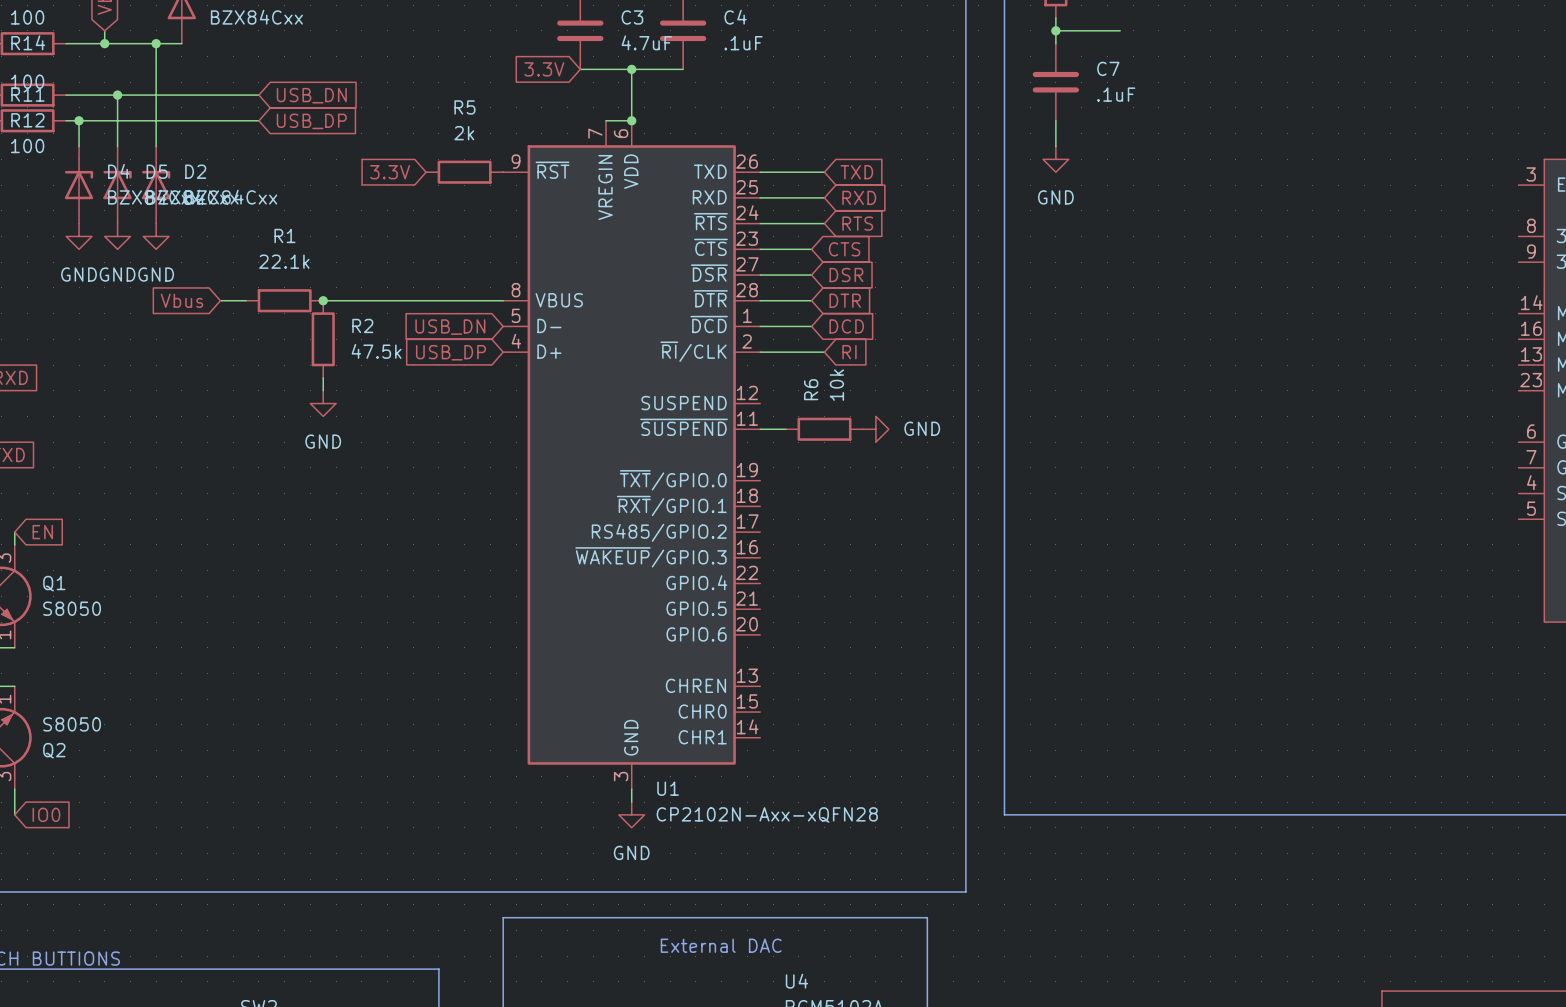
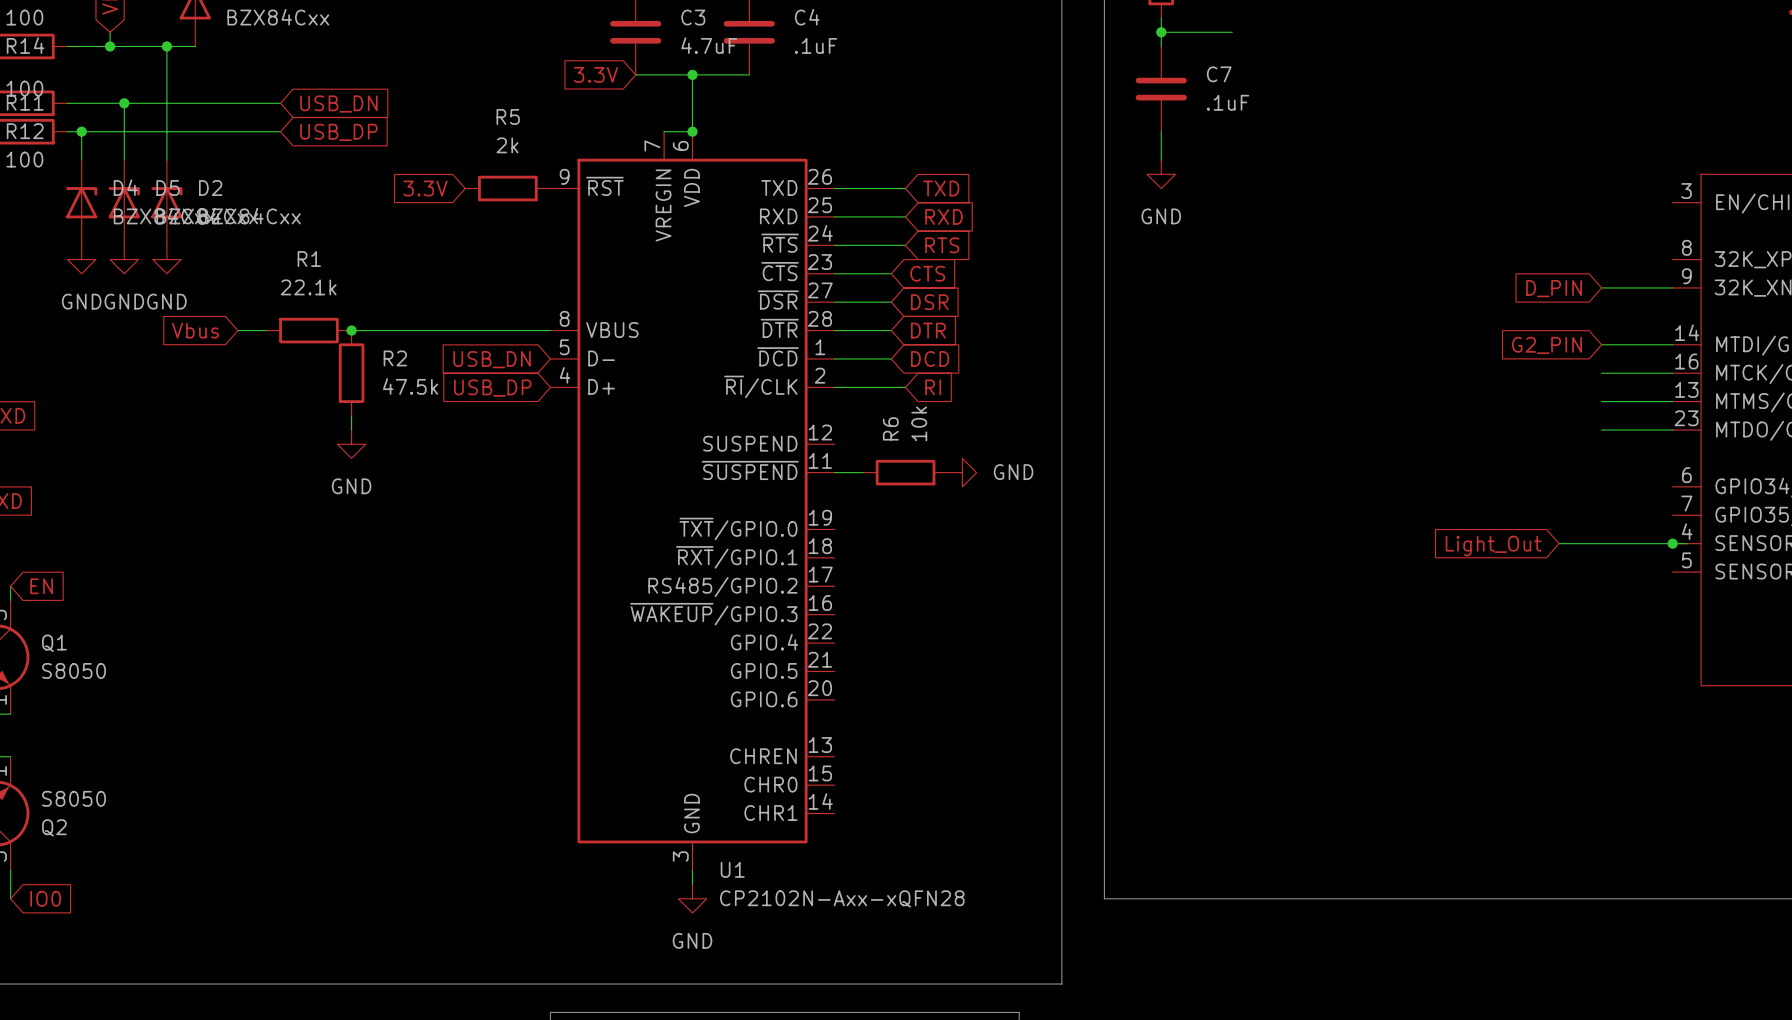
global label: none -> D_PIN (1554, 288)
wire: none -> (1601, 287) (1672, 287)
wire: none -> (1601, 344) (1672, 344)
global label: none -> G2_PIN (1546, 345)
wire: none -> (1601, 373) (1672, 373)
wire: none -> (1601, 401) (1672, 401)
wire: none -> (1601, 430) (1672, 430)
wire: none -> (1559, 543) (1686, 543)
junction: none -> (1672, 543)
global label: none -> Light_Out (1493, 546)

